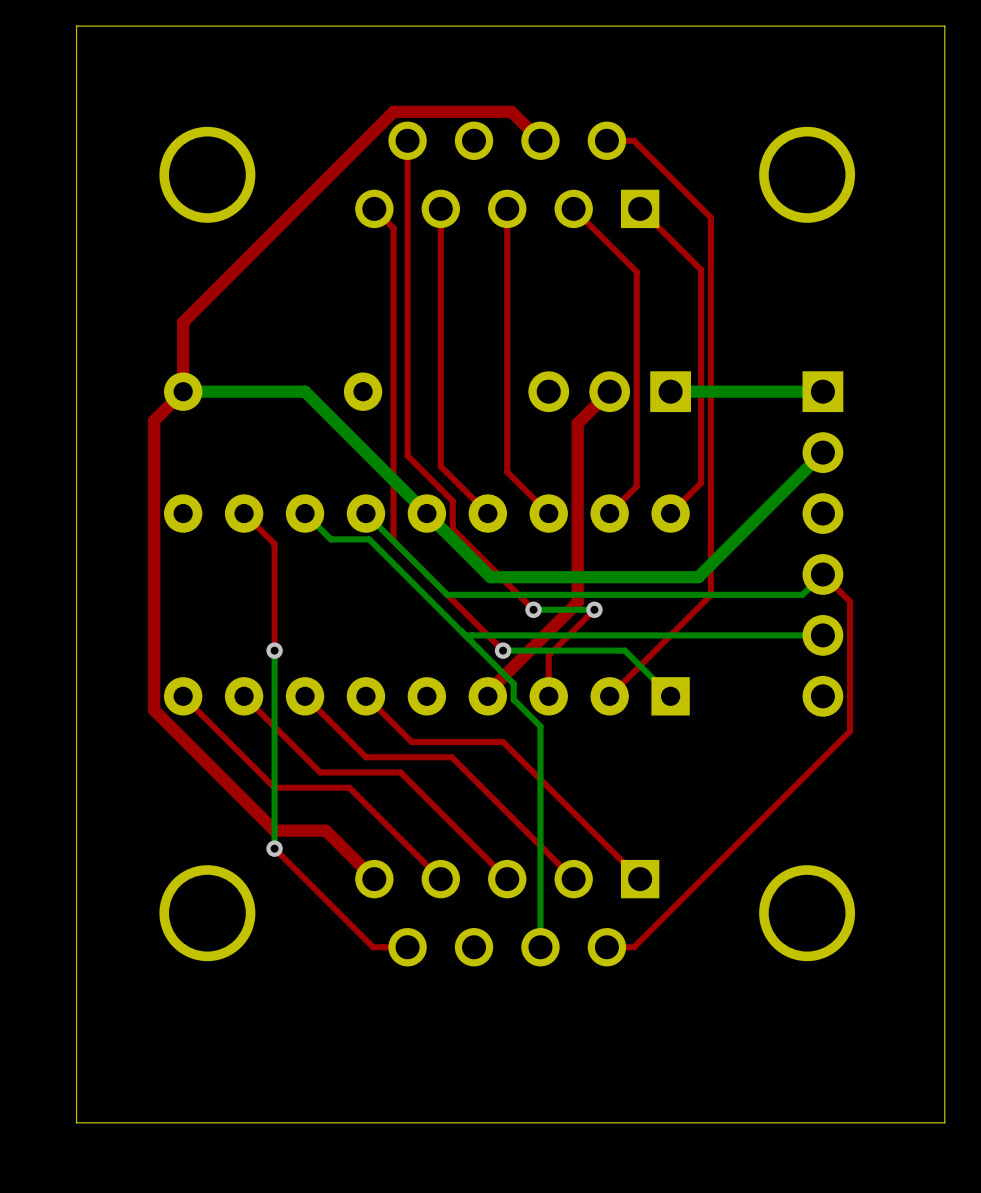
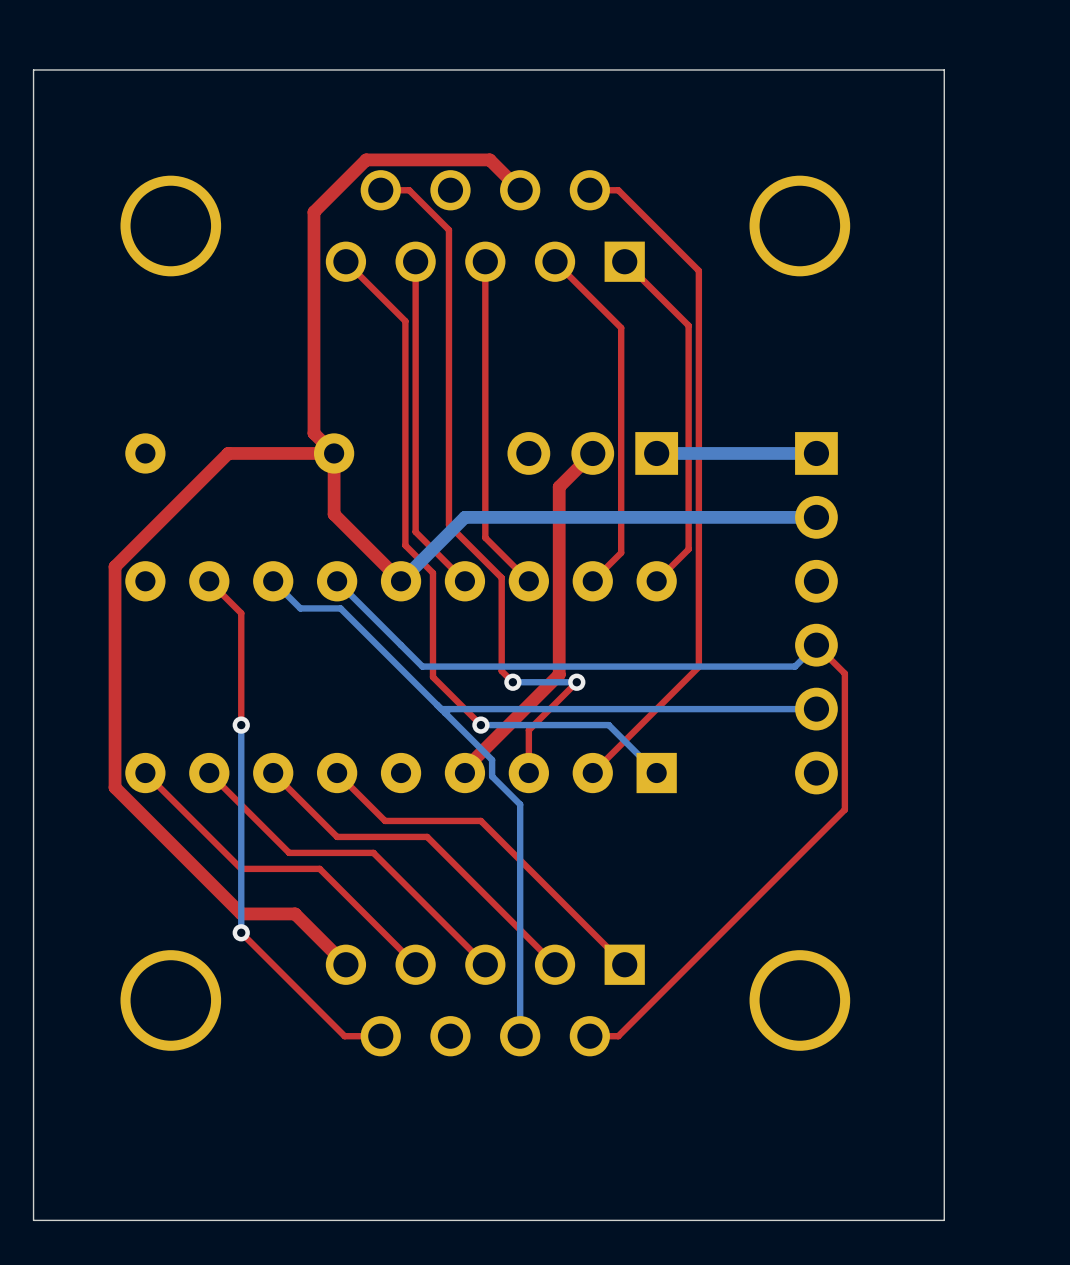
top track: (407, 140) (407, 455) (431, 479) -> (366, 281) (405, 321) (405, 545)
top track: none -> (380, 190) (409, 190) (448, 229) (448, 525) (501, 577) (501, 671)
top track: (343, 161) (183, 322) (183, 391) (154, 420) (154, 499) -> (334, 453) (228, 453) (115, 566)
top track: none -> (313, 212) (313, 433) (334, 453)
top track: (393, 228) (393, 541) (457, 604) -> none
bottom track: (183, 391) (305, 391) (490, 577) (698, 577) (822, 452) -> (401, 581) (464, 517) (816, 517)
top track: none -> (334, 453) (334, 514) (401, 581)
top track: (452, 501) (452, 529) (522, 599) -> (428, 568) (432, 573) (432, 677)

